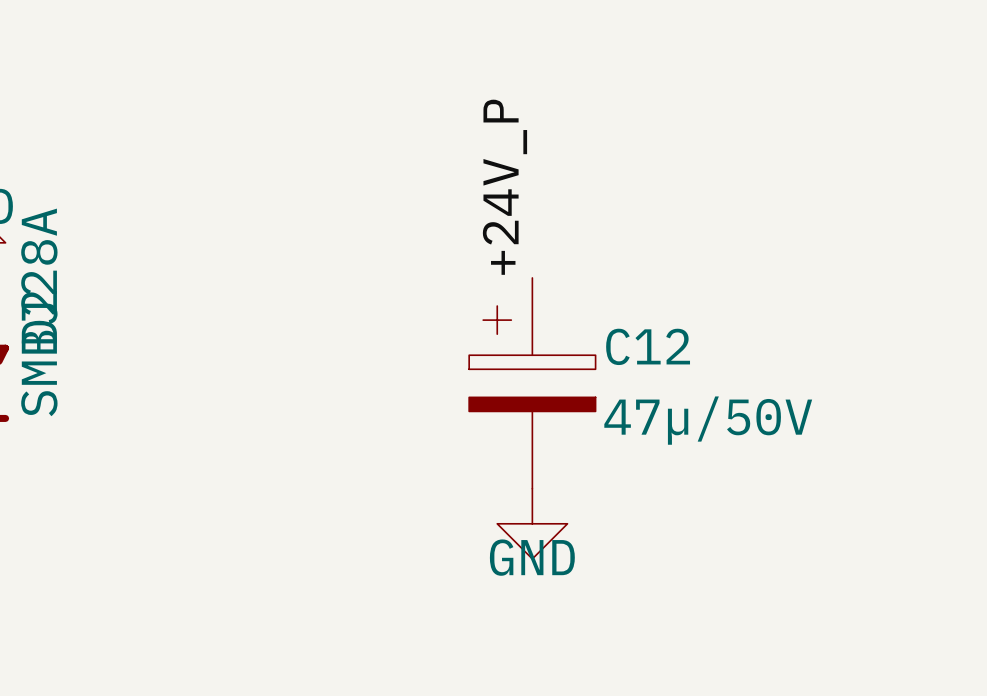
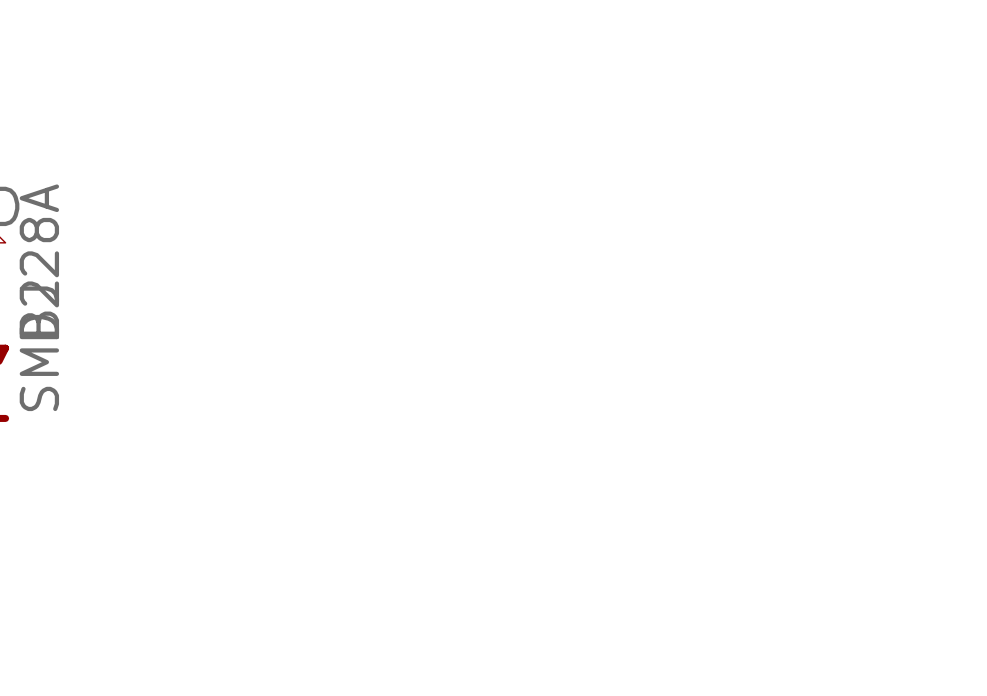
label: +24V_P (504, 187) -> none
C12: 47µ/50V (532, 383) -> none
power symbol: GND (532, 523) -> none

